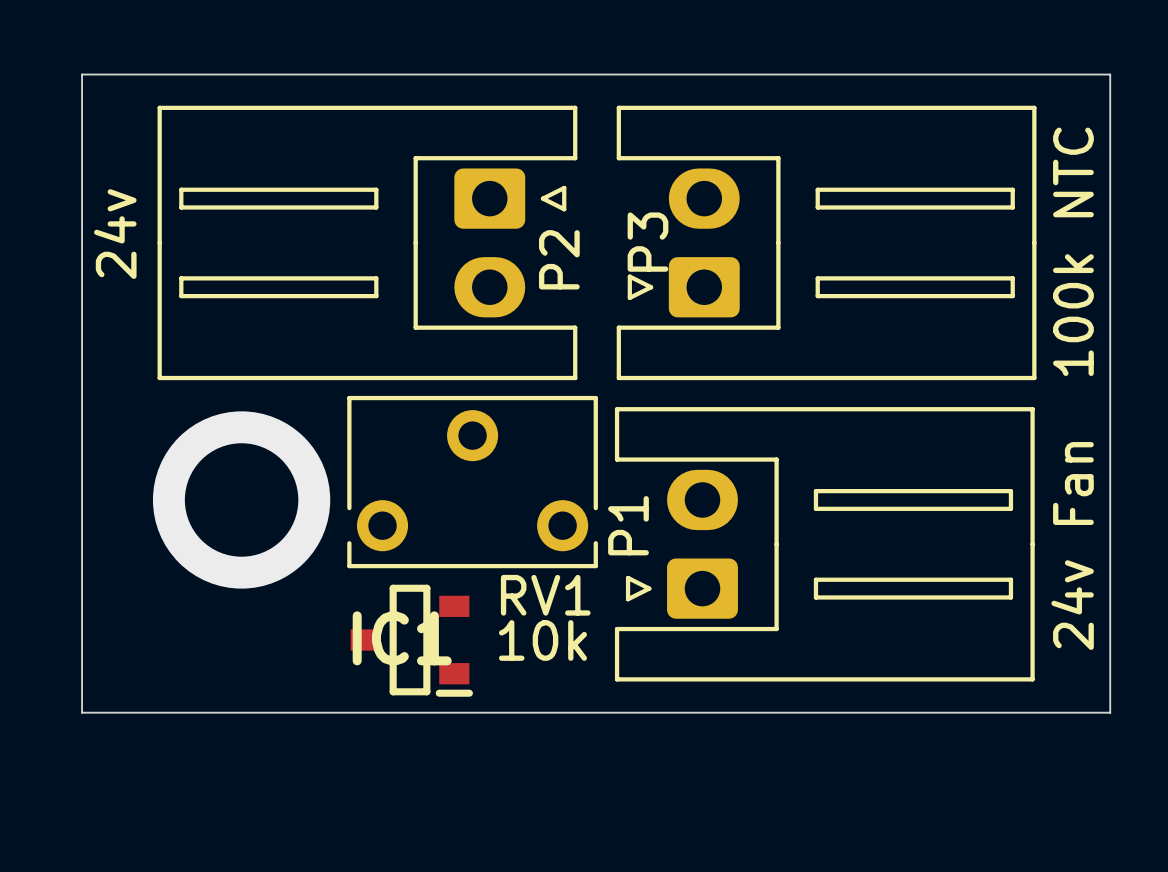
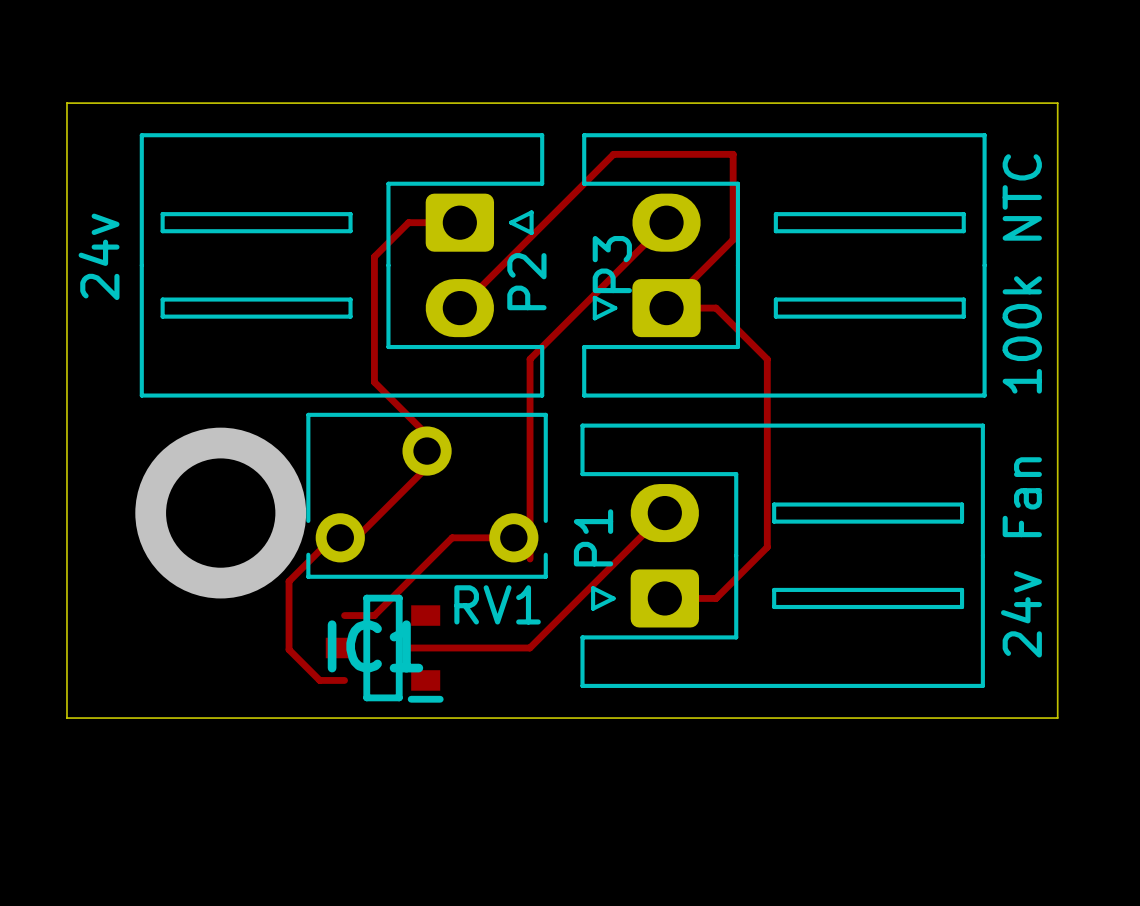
track: none -> (459, 222) (408, 222) (374, 256) (374, 382) (443, 451) (356, 537) (332, 537) (289, 581) (289, 649) (319, 680) (344, 680)
track: none -> (666, 222) (530, 359) (530, 559)
track: none -> (459, 308) (613, 154) (733, 154) (733, 239) (666, 308) (716, 308) (767, 359) (767, 547) (716, 598) (664, 598)
RV1 position: (472, 482) -> (427, 495)
track: none -> (664, 513) (529, 648) (408, 648)
track: none -> (530, 537) (452, 537) (374, 615) (344, 615)
RV1 value: 10k (542, 640) -> none

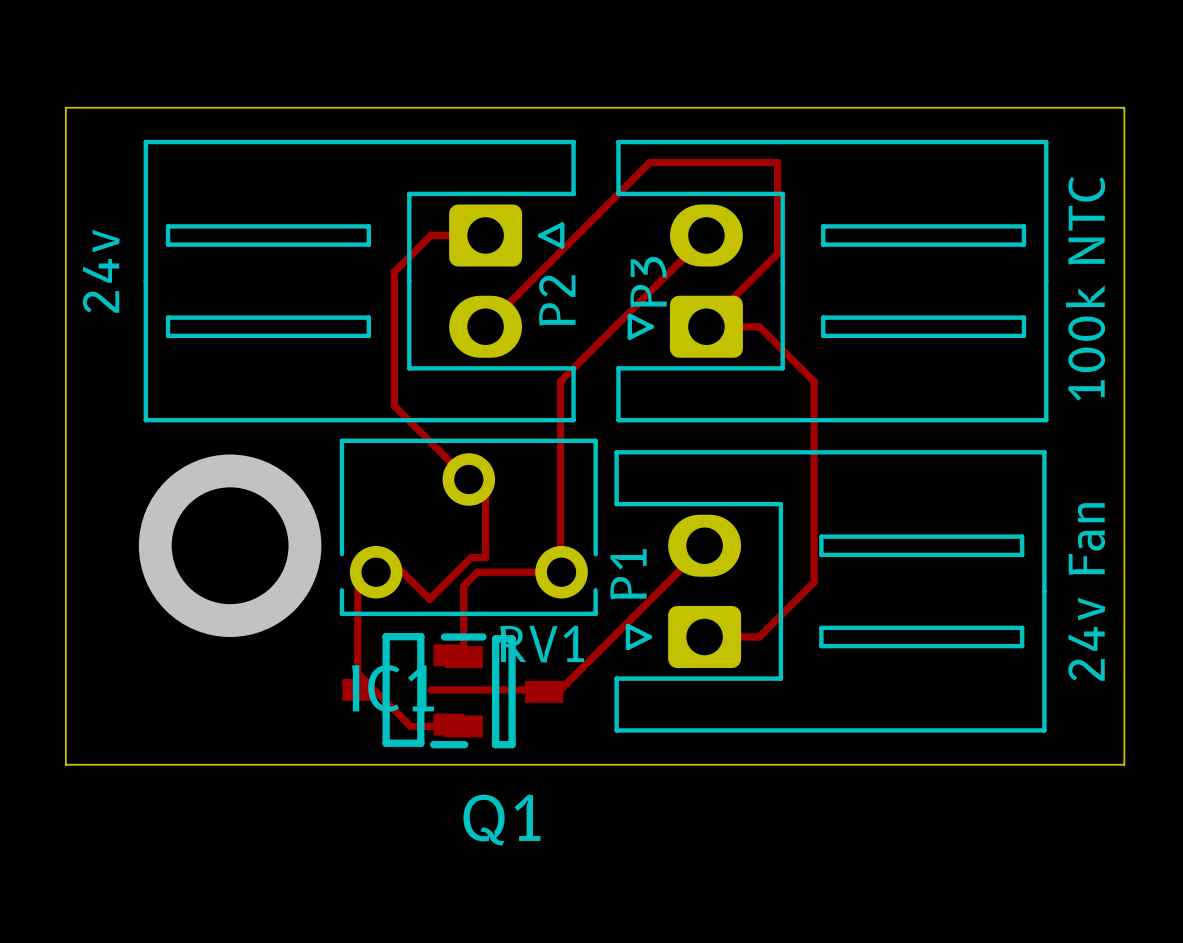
track: (443, 451) (356, 537) -> (467, 479) (485, 497) (485, 557) (471, 557) (429, 599) (402, 572) (375, 572)
RV1 position: (427, 495) -> (468, 527)
track: (340, 537) (332, 537) (289, 581) (289, 649) (319, 680) (344, 680) -> (357, 572) (357, 673) (410, 726) (463, 726)
track: (439, 550) (374, 615) (344, 615) -> (463, 585) (463, 657)
Q1: none -> (502, 690)

